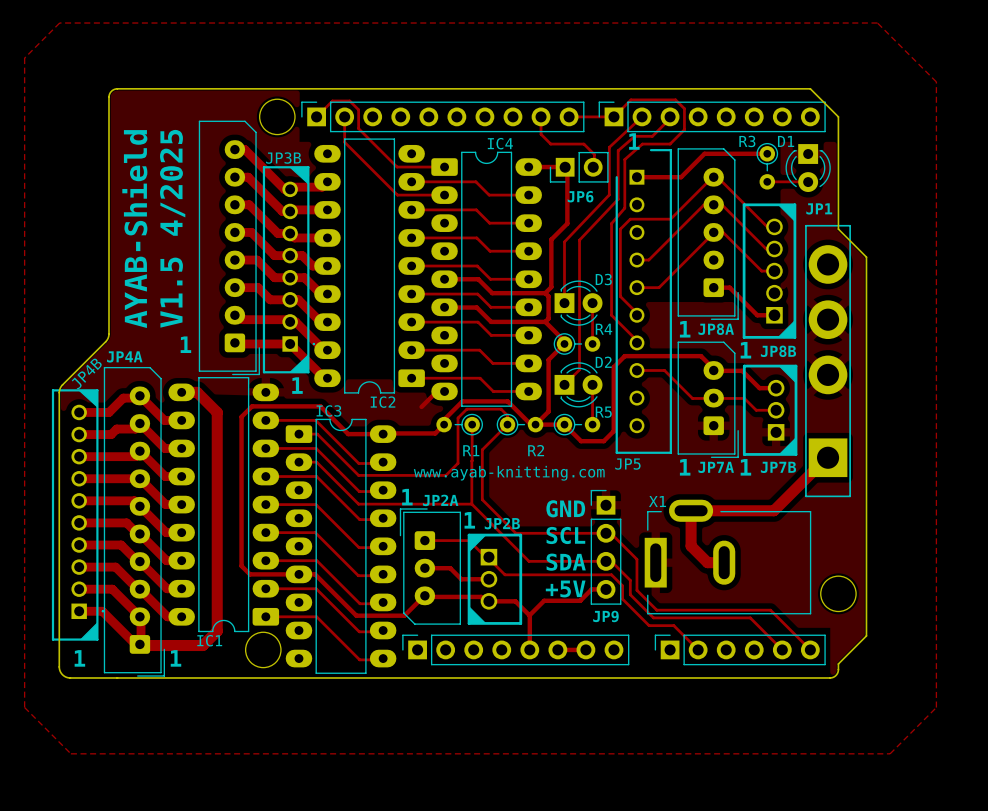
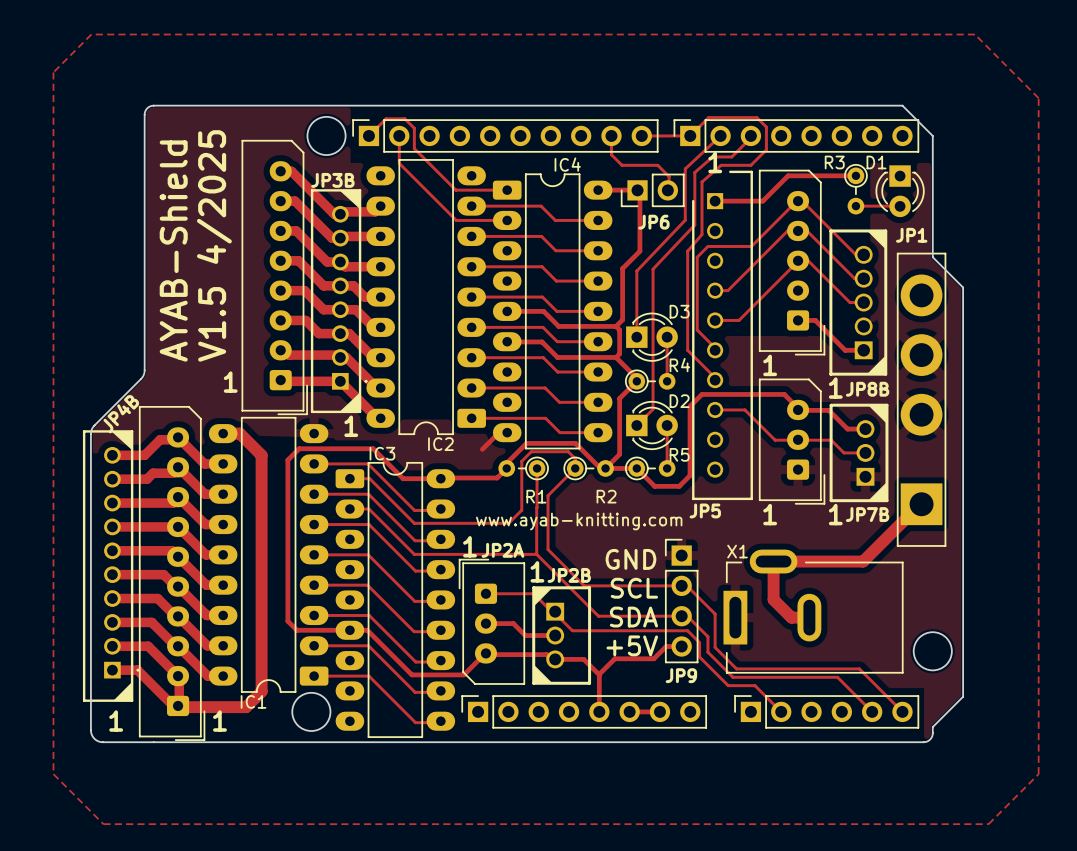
JP8A name: JP8A (716, 329) -> none
JP4A name: JP4A (124, 356) -> none
JP7A name: JP7A (716, 467) -> none

